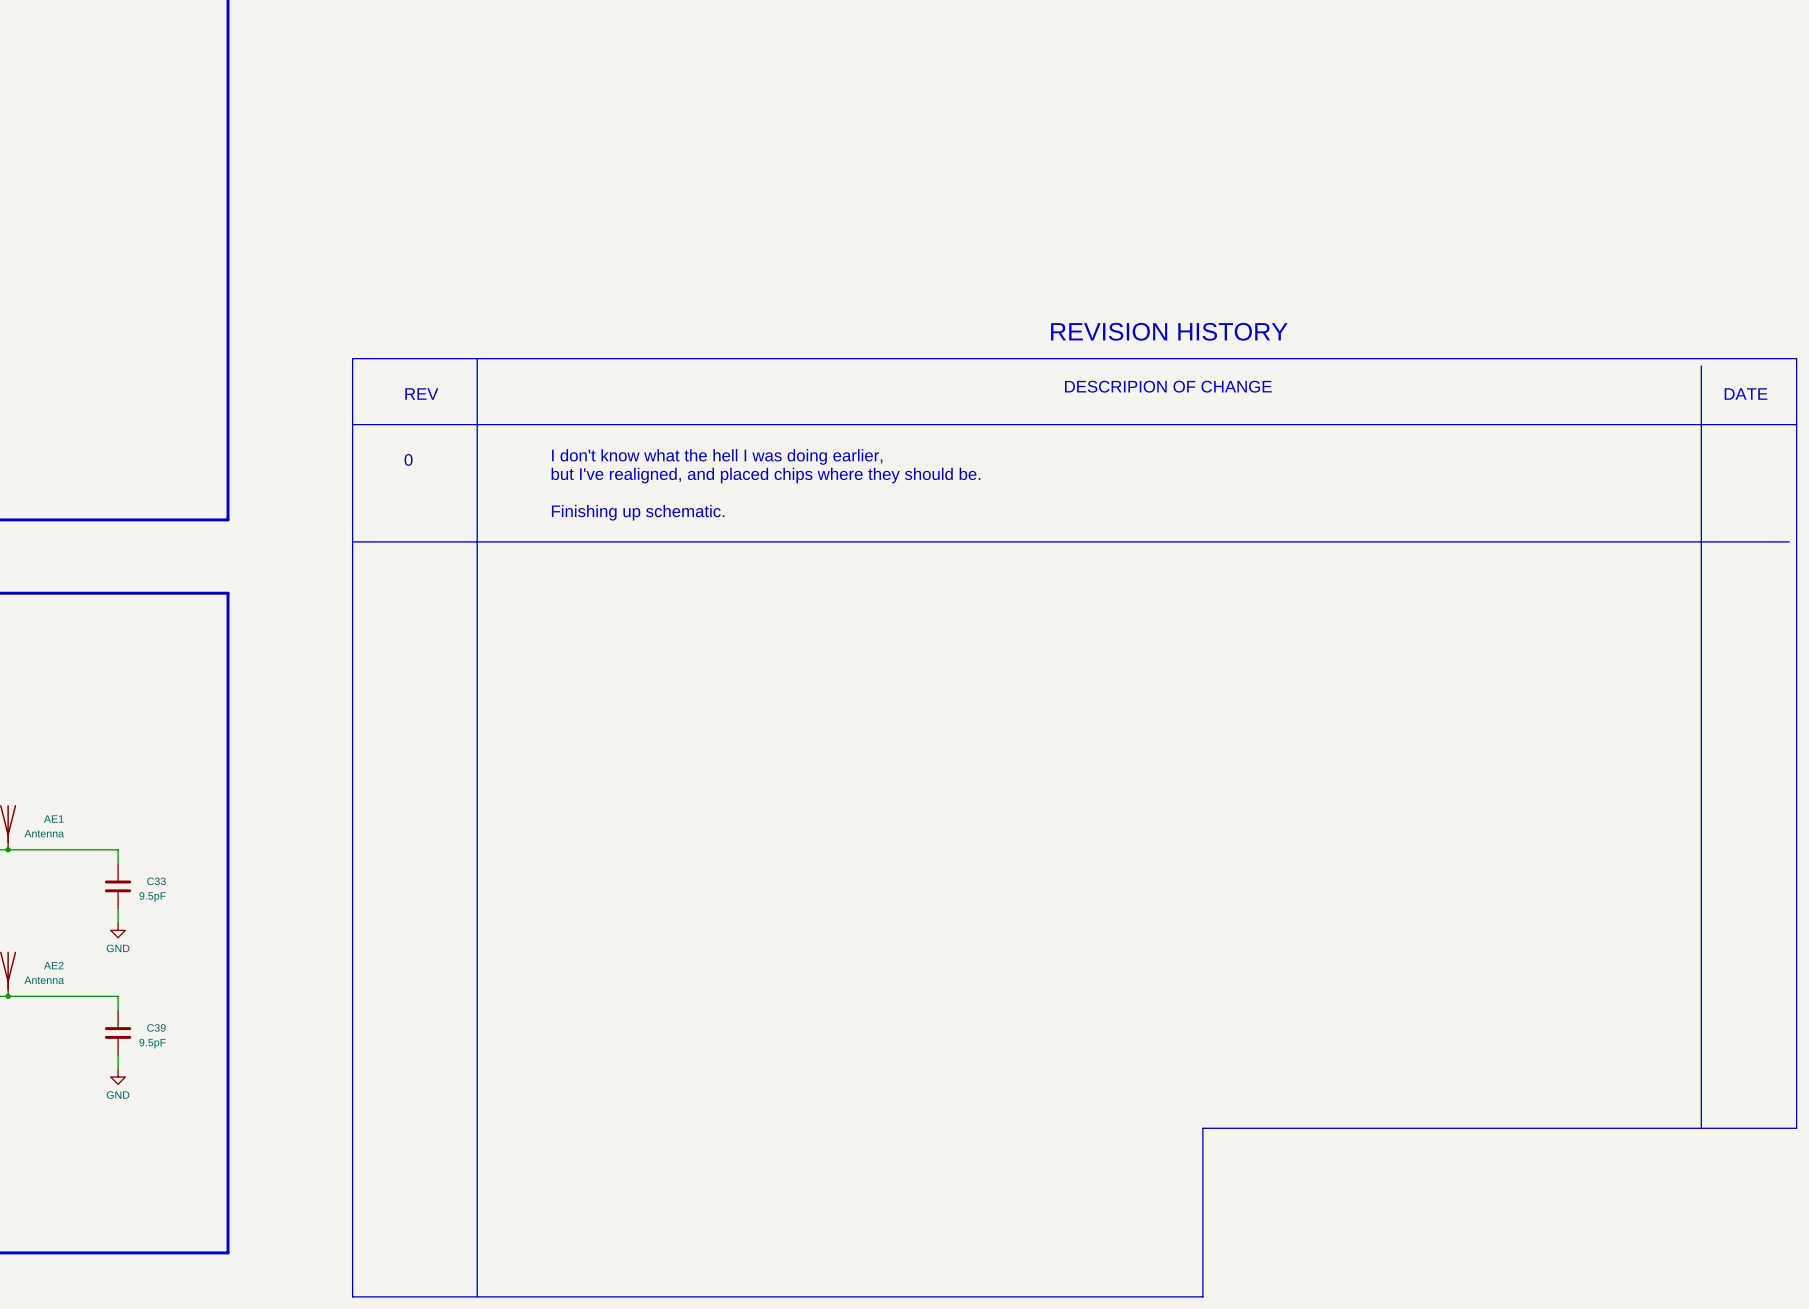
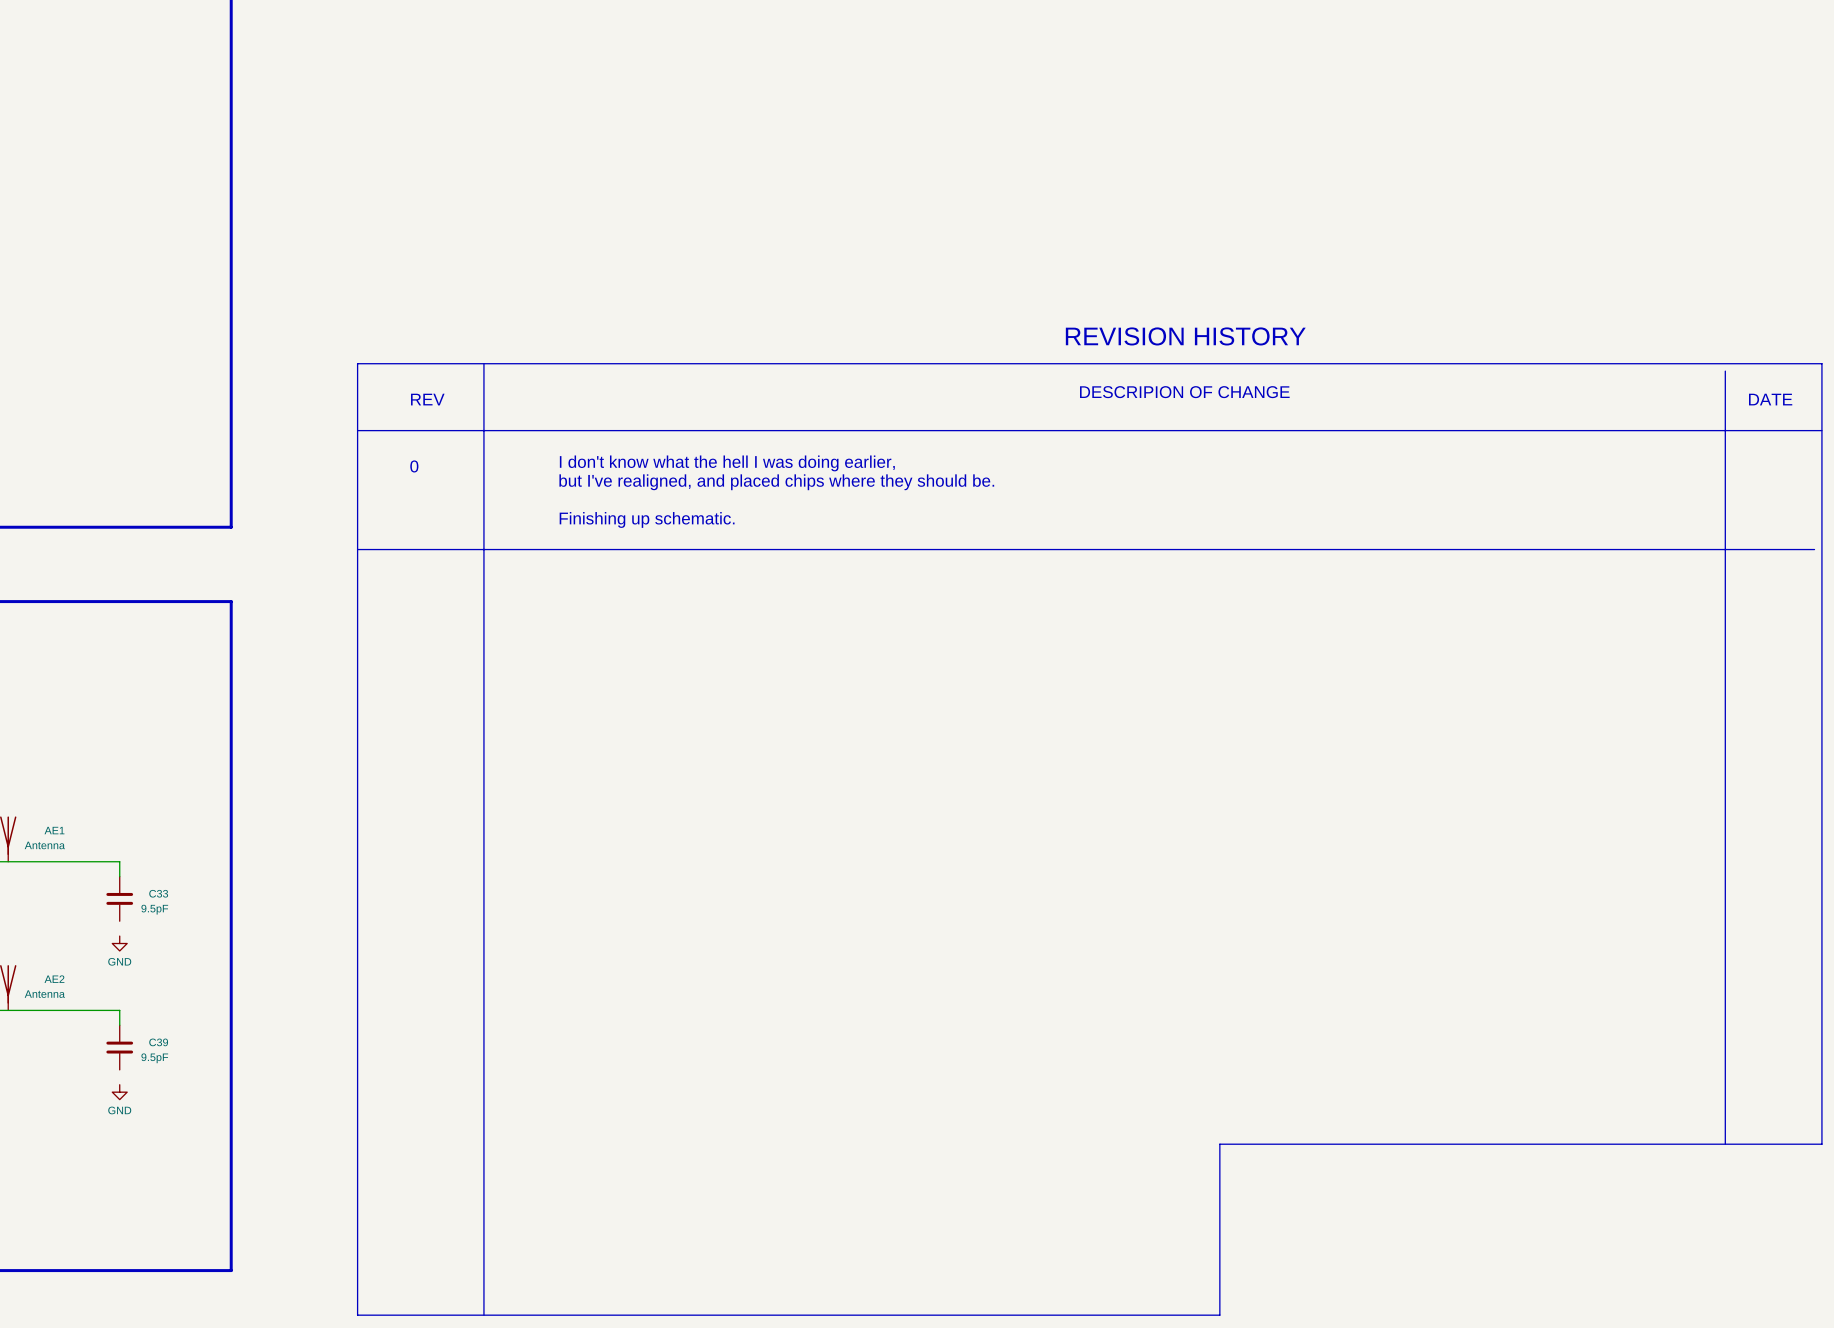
junction: (8, 849) -> none
wire: (118, 908) (118, 923) -> none
junction: (8, 996) -> none
wire: (118, 1055) (118, 1069) -> none

